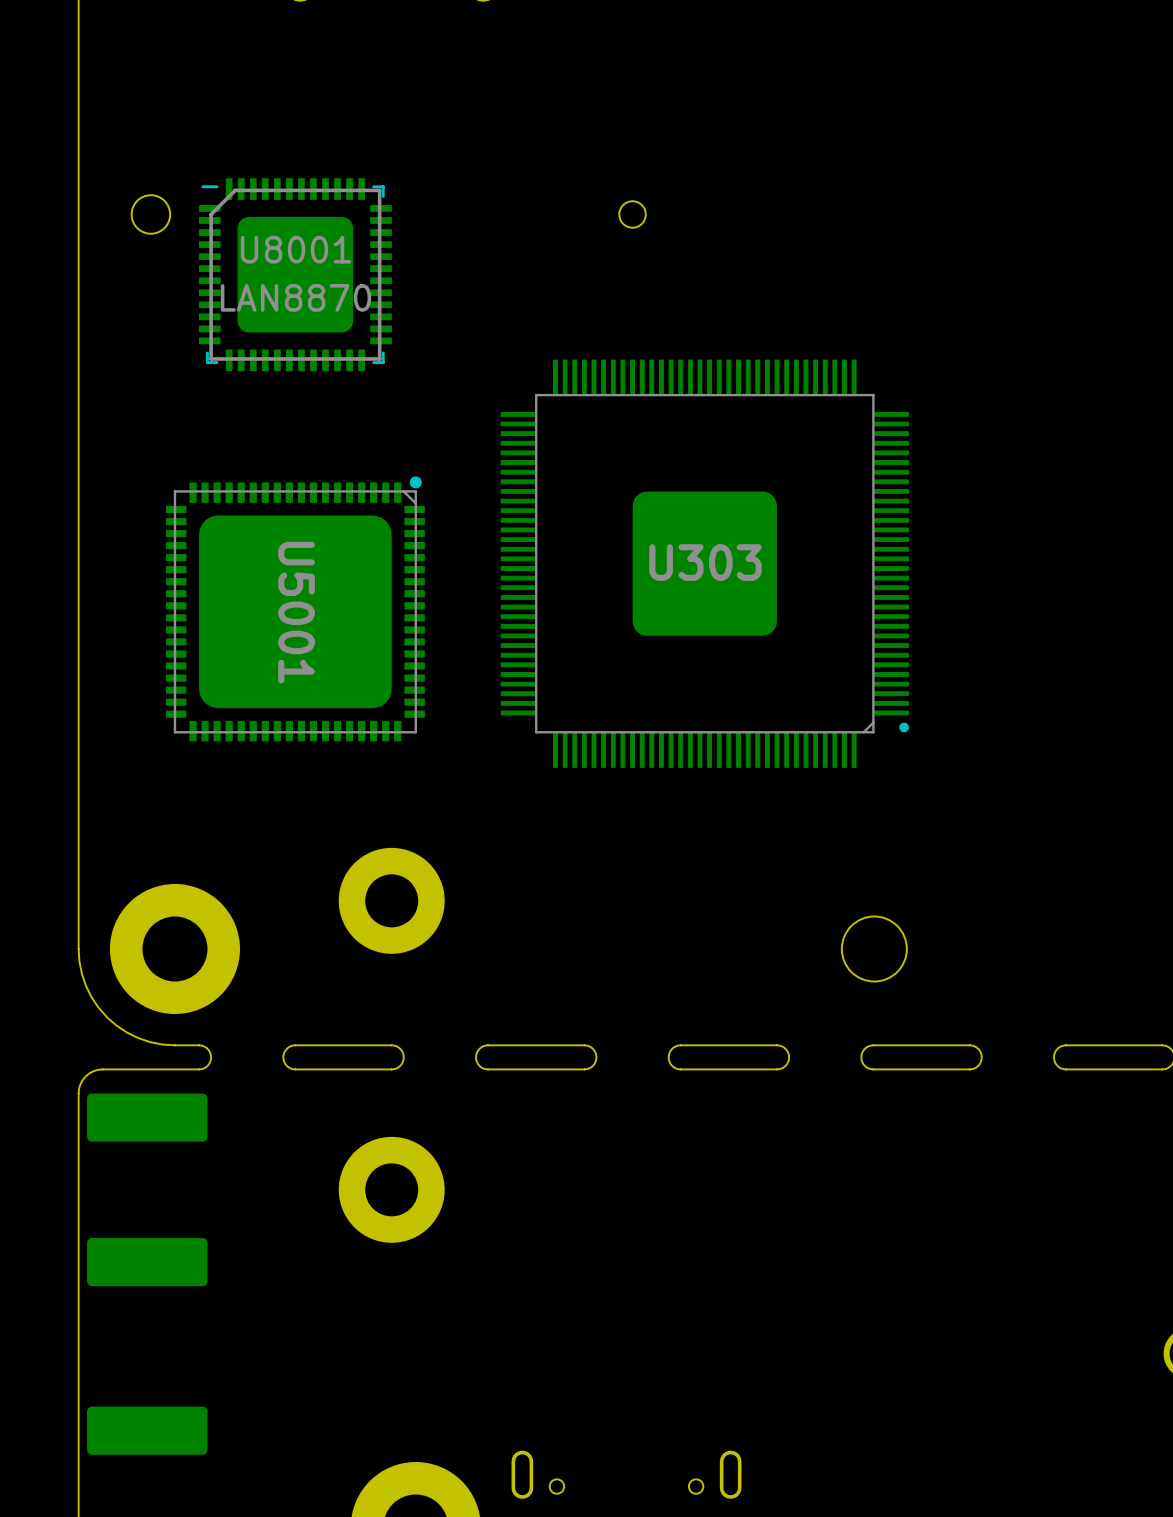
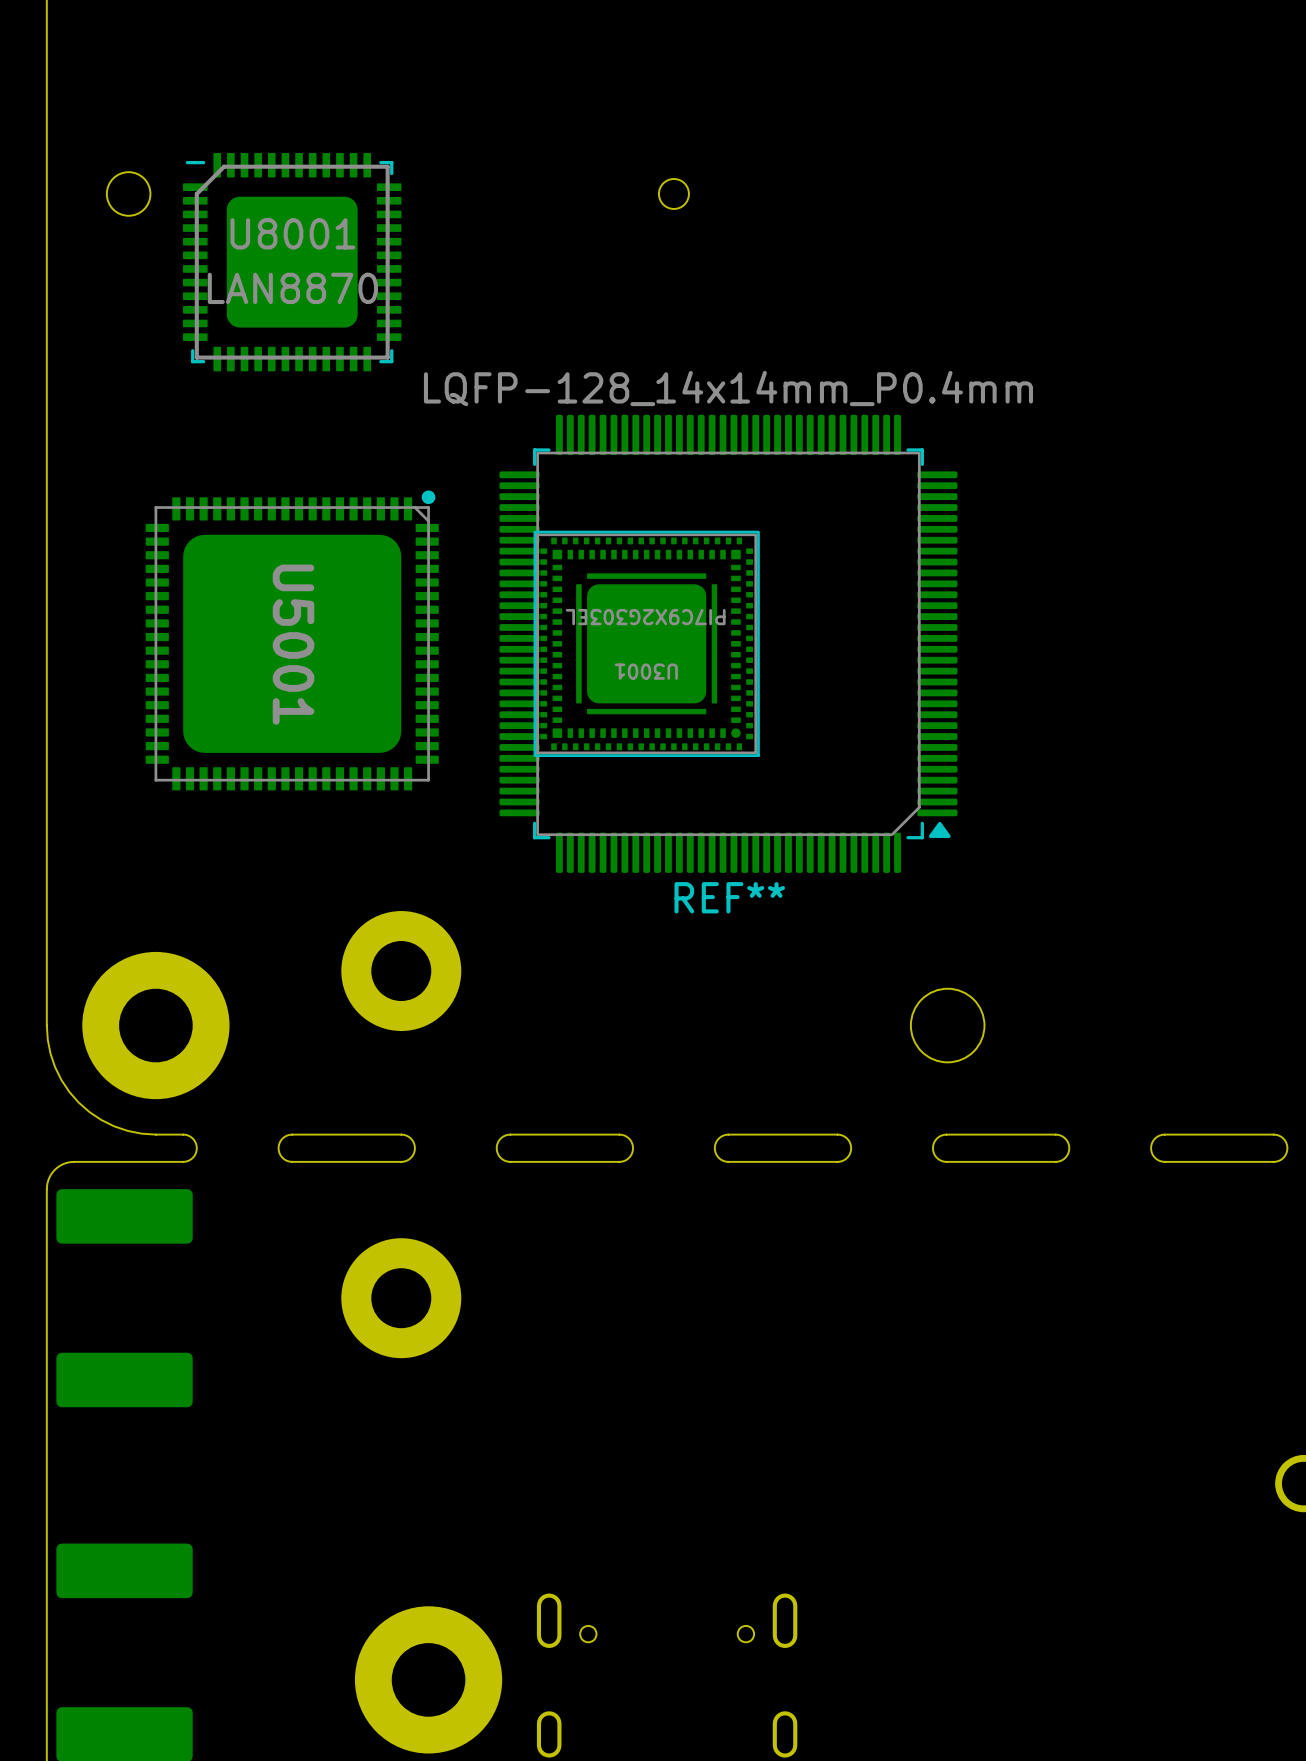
U303: (704, 563) -> none
U3001: none -> PI7C9X2G303EL (646, 643)
REF**: none -> LQFP-128_14x14mm_P0.4mm (728, 643)

